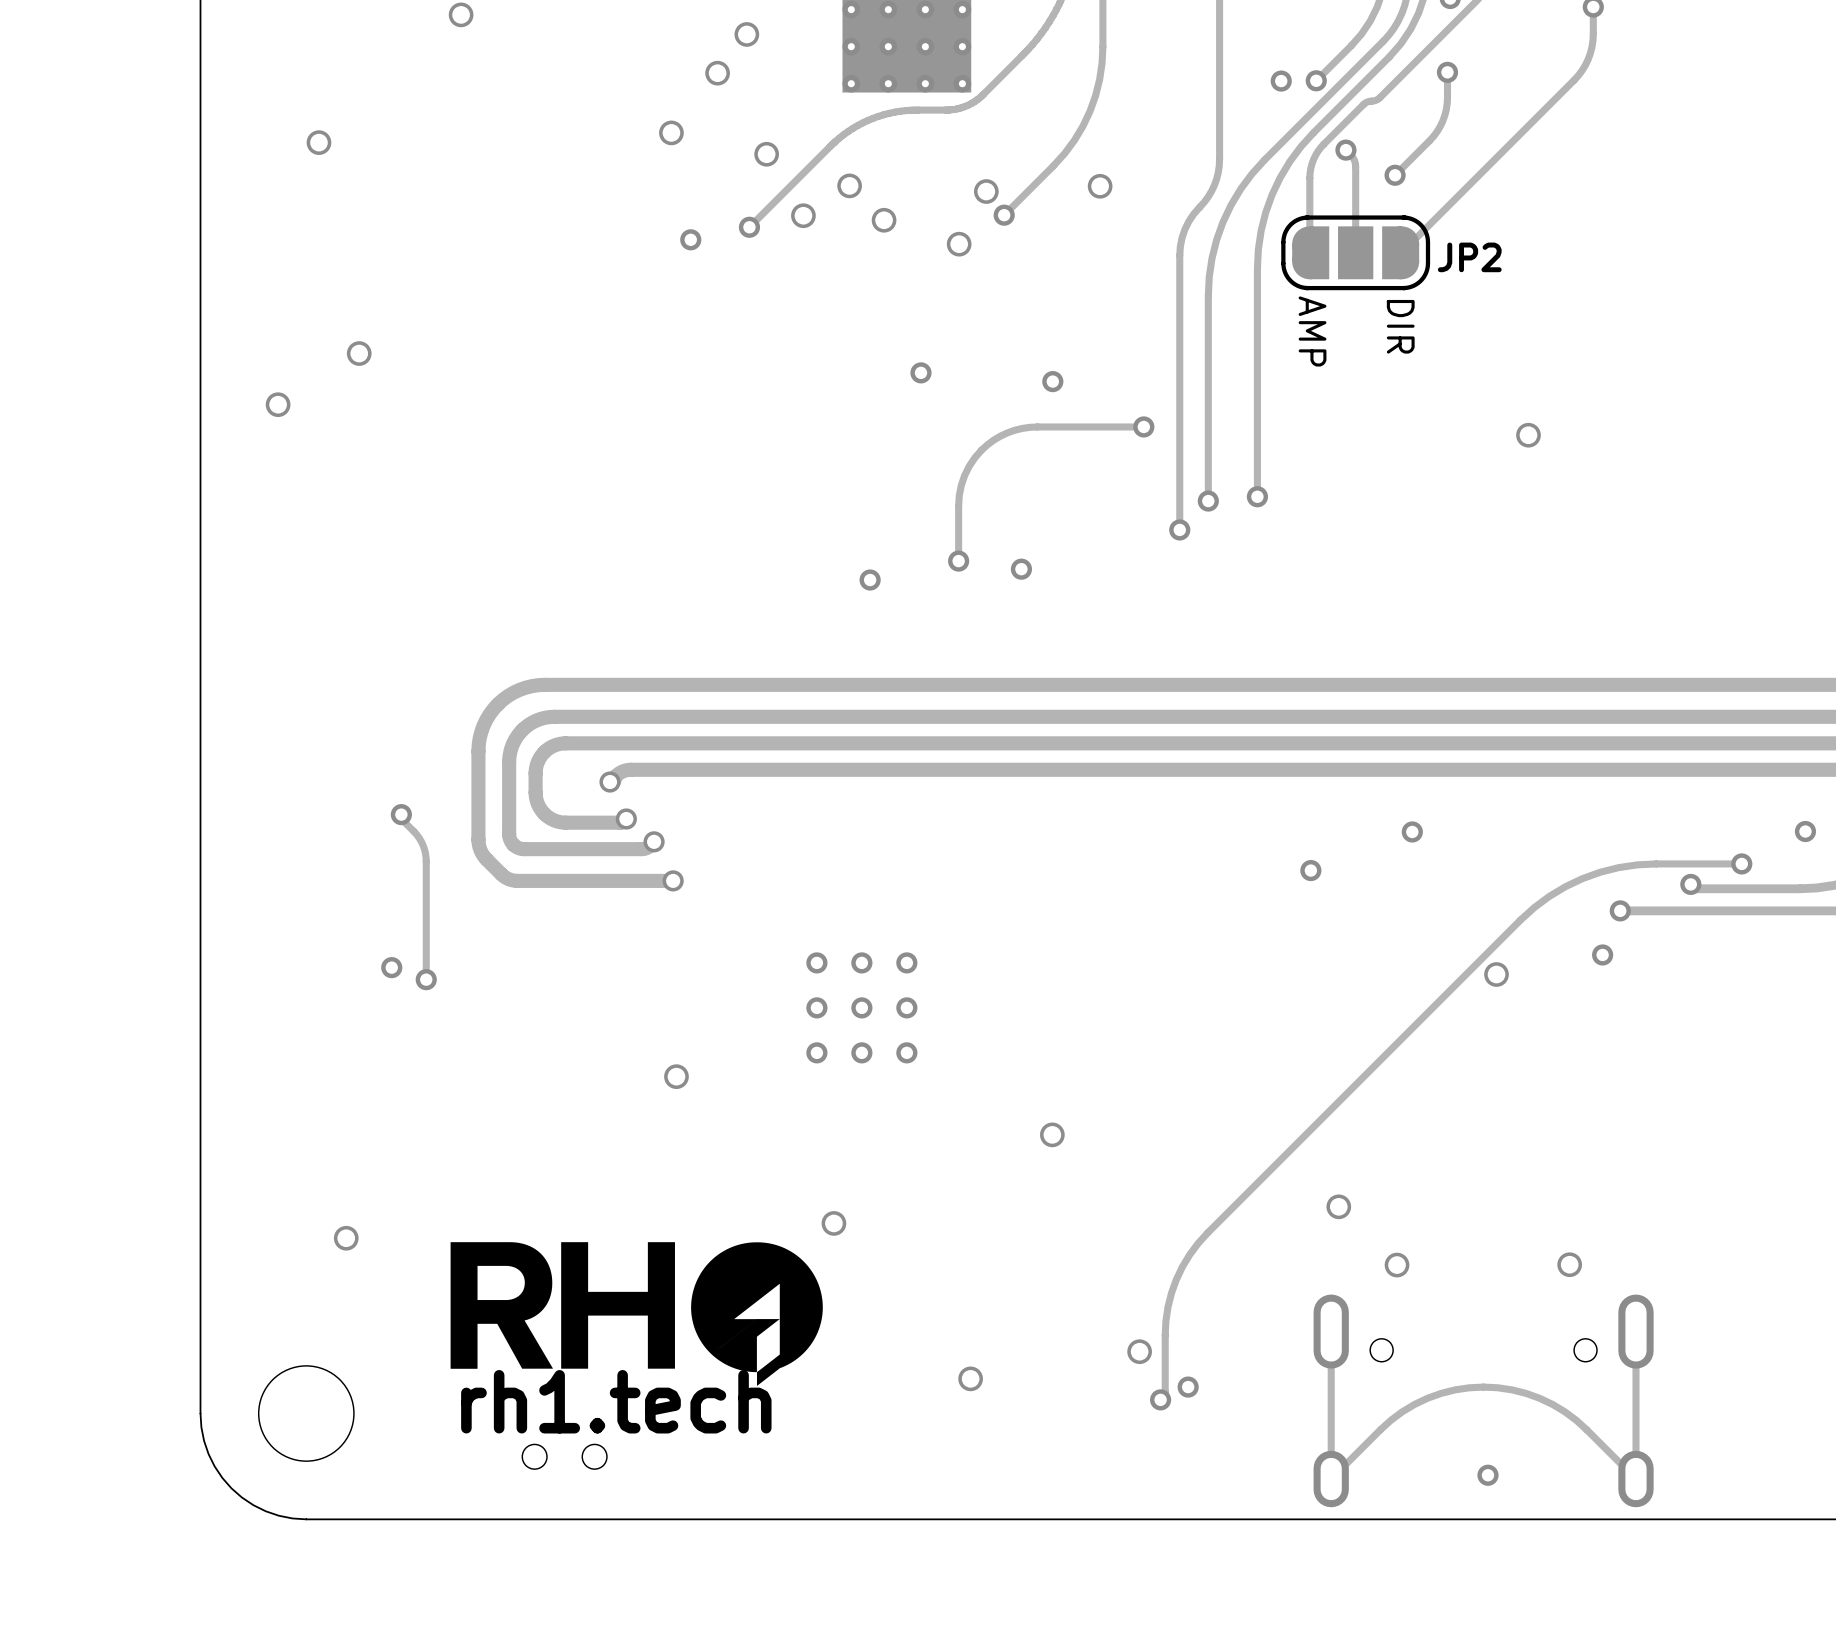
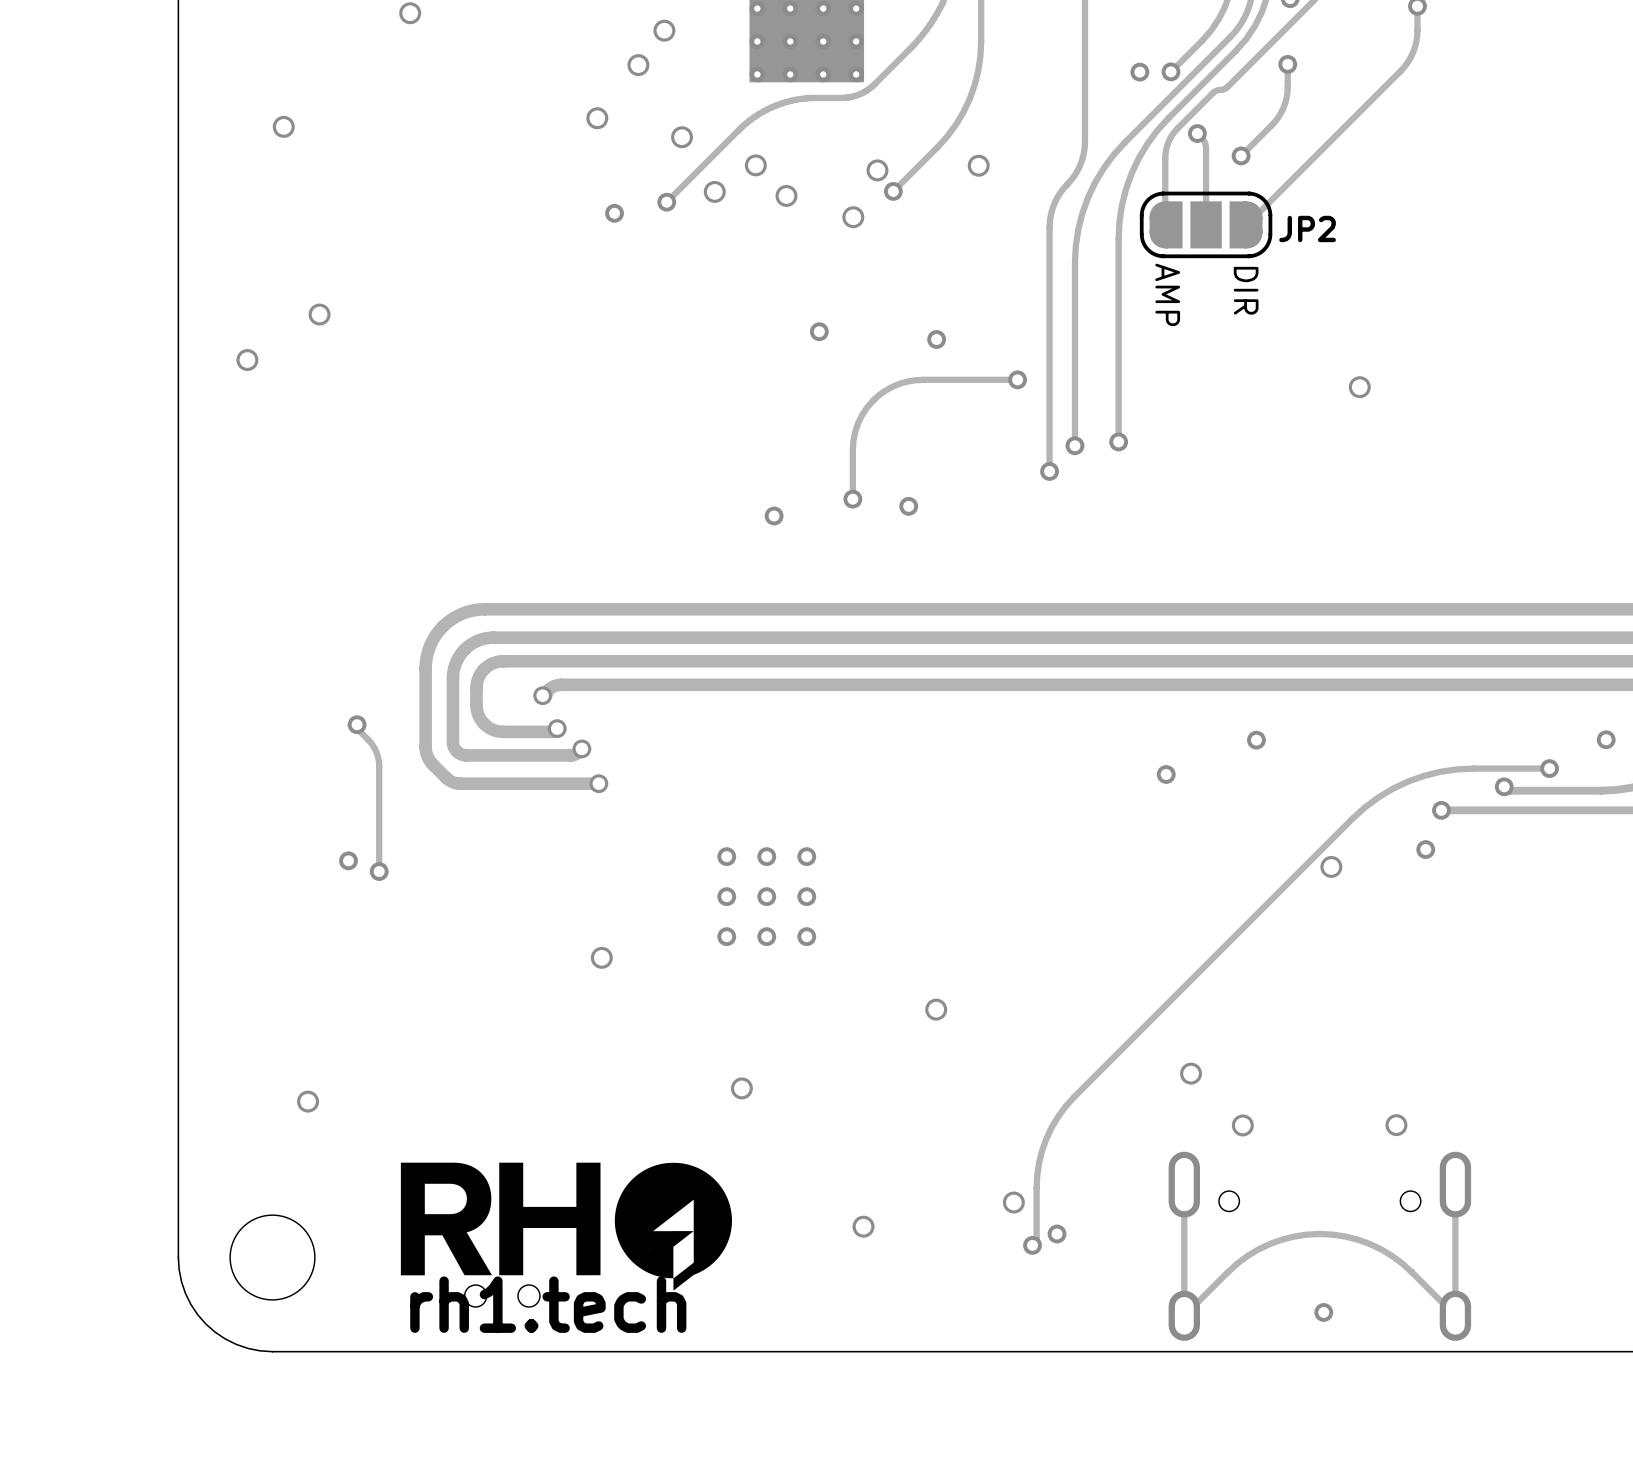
drawing position: (501, 1305) -> (446, 1219)
drawing position: (618, 1305) -> (549, 1218)
drawing position: (756, 1314) -> (673, 1226)
drawing position: (768, 1327) -> (683, 1238)
drawing position: (740, 1354) -> (658, 1262)
text position: rh1.tech (616, 1401) -> rh1.tech (548, 1304)

